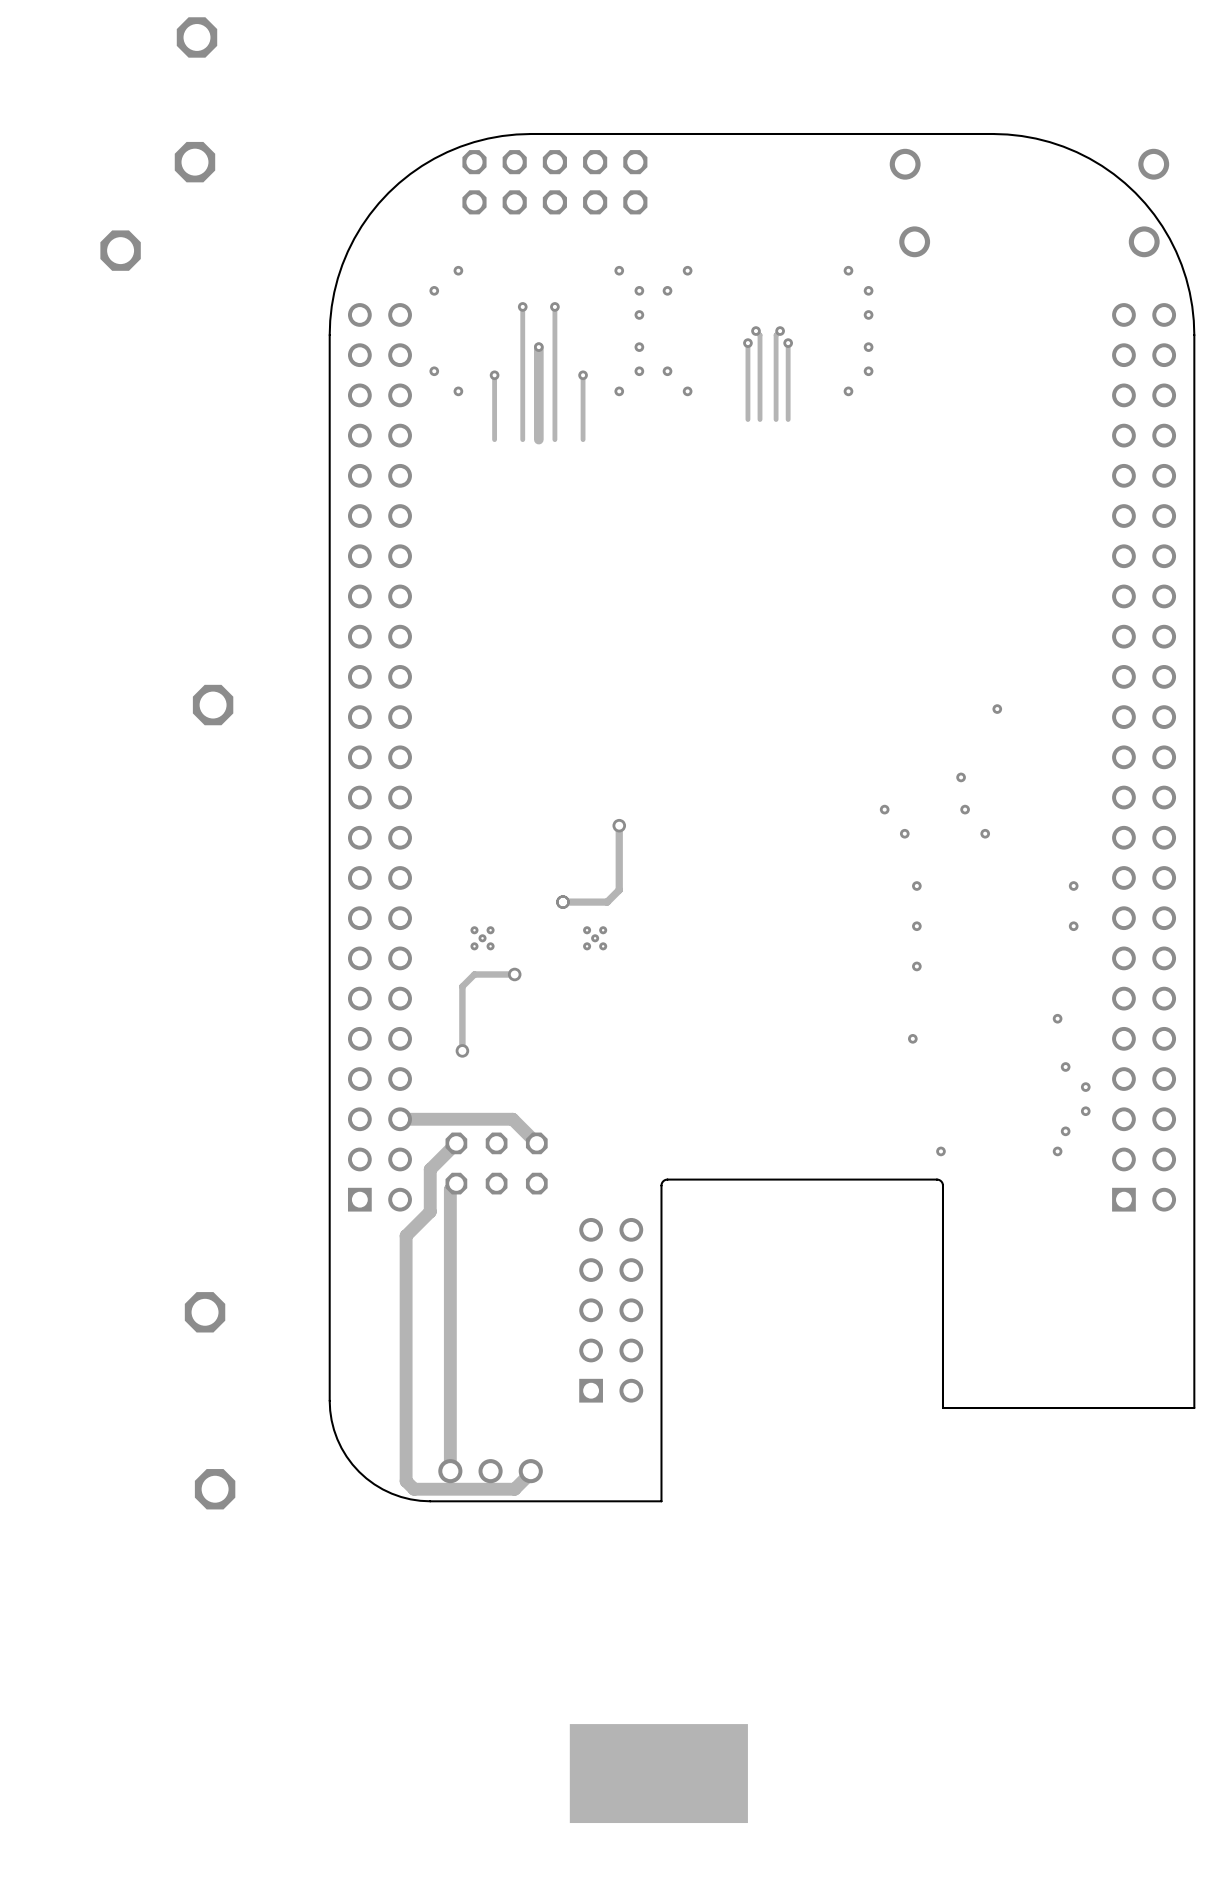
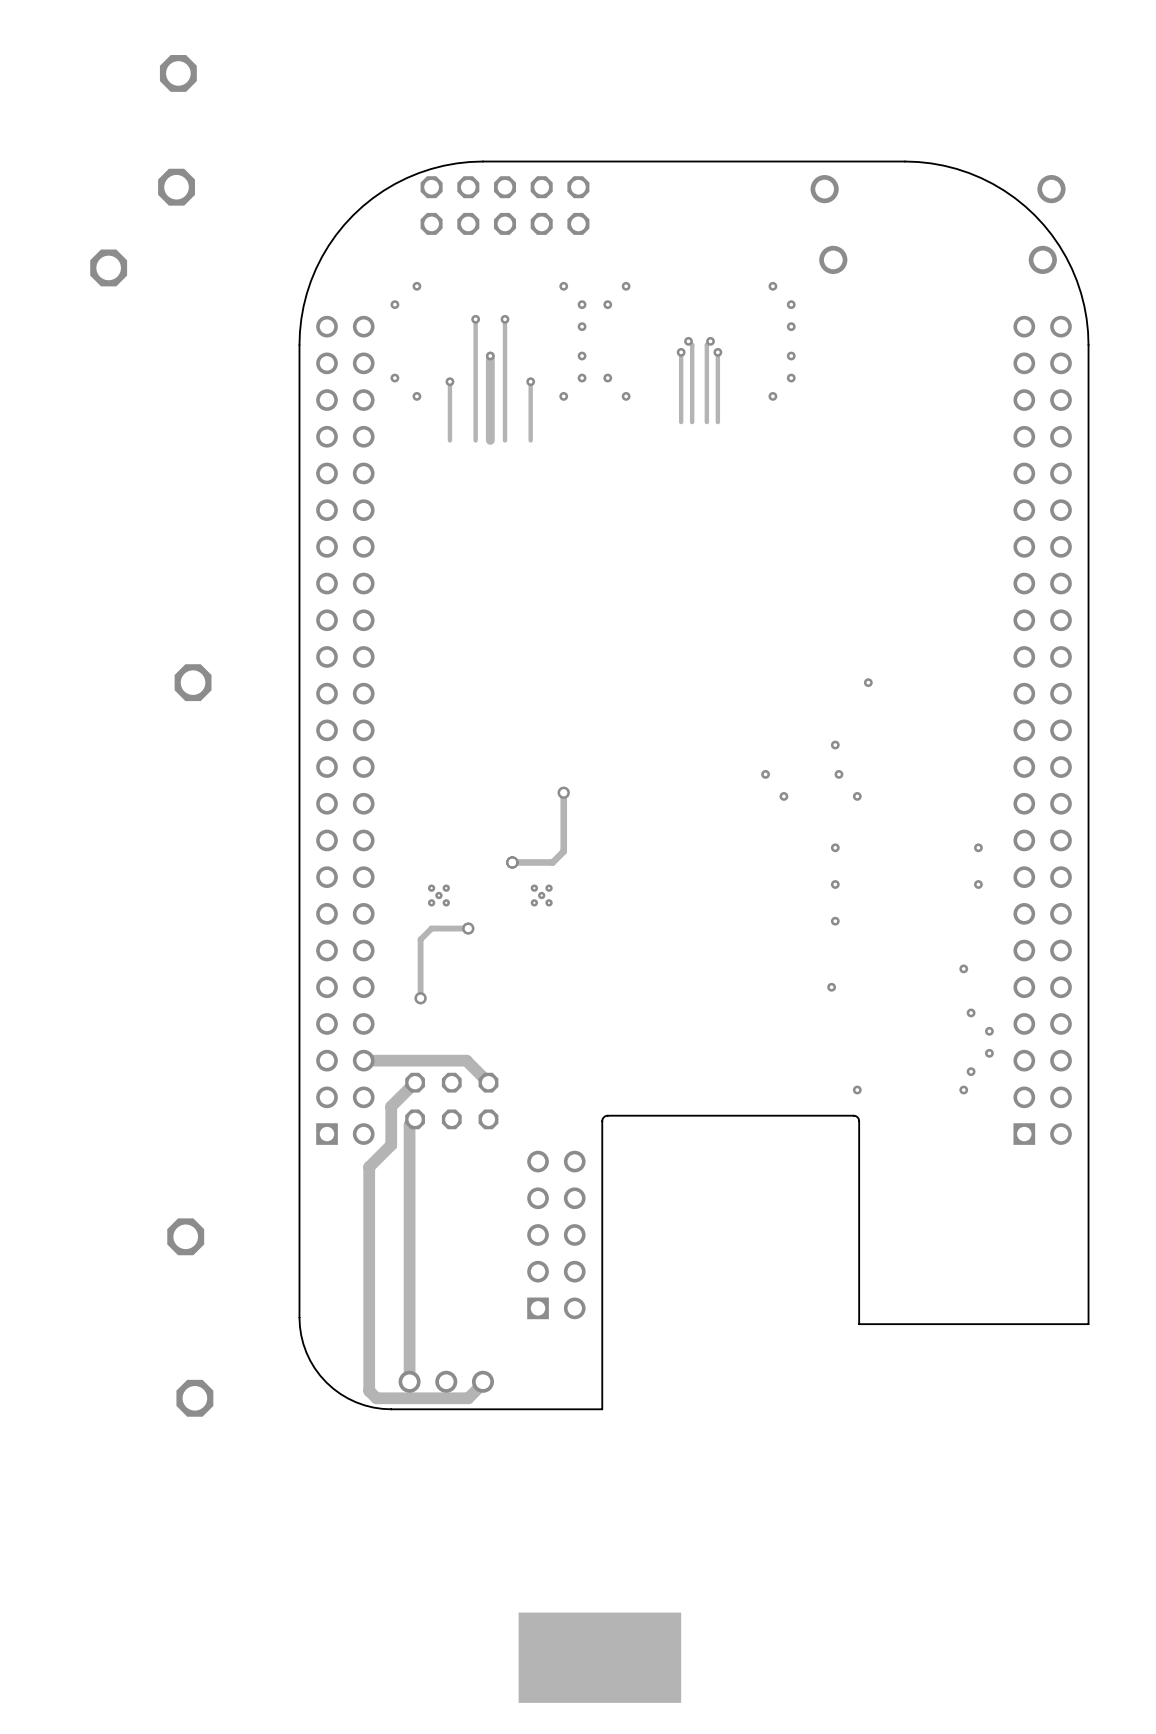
via: none -> (868, 682)
via: (997, 709) -> none
via: none -> (835, 745)
via: (961, 777) -> none
via: none -> (765, 774)
via: none -> (838, 774)
via: (884, 809) -> none
via: (965, 809) -> none
via: none -> (783, 796)
via: none -> (857, 796)
via: (904, 833) -> none
via: (985, 833) -> none

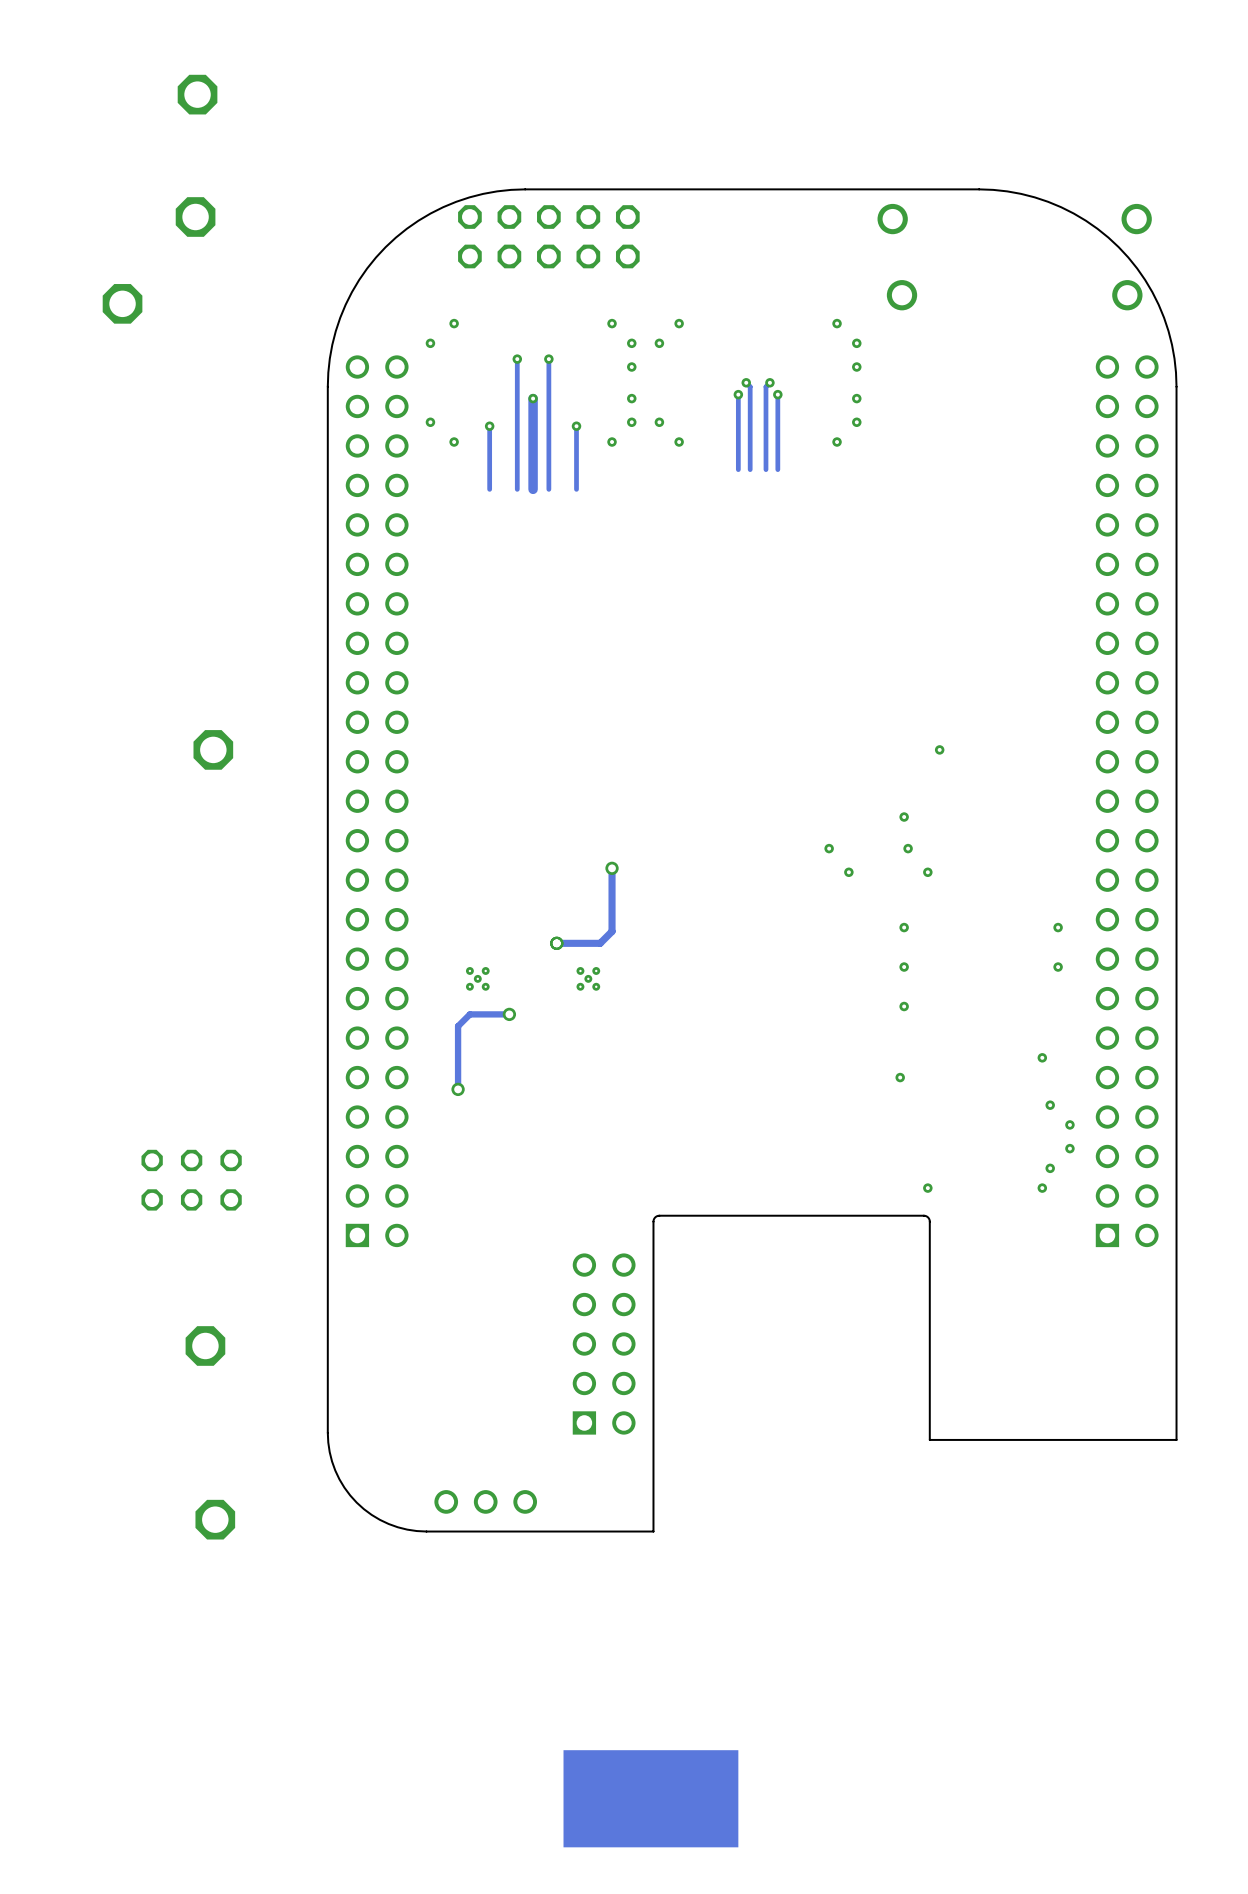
track: (363, 1060) (466, 1060) (488, 1082) -> none
track: (415, 1082) (391, 1106) (391, 1145) (369, 1167) (369, 1390) (376, 1398) (468, 1398) (482, 1381) -> none
part position: (451, 1101) -> (191, 1180)
track: (415, 1119) (409, 1124) (409, 1381) -> none

